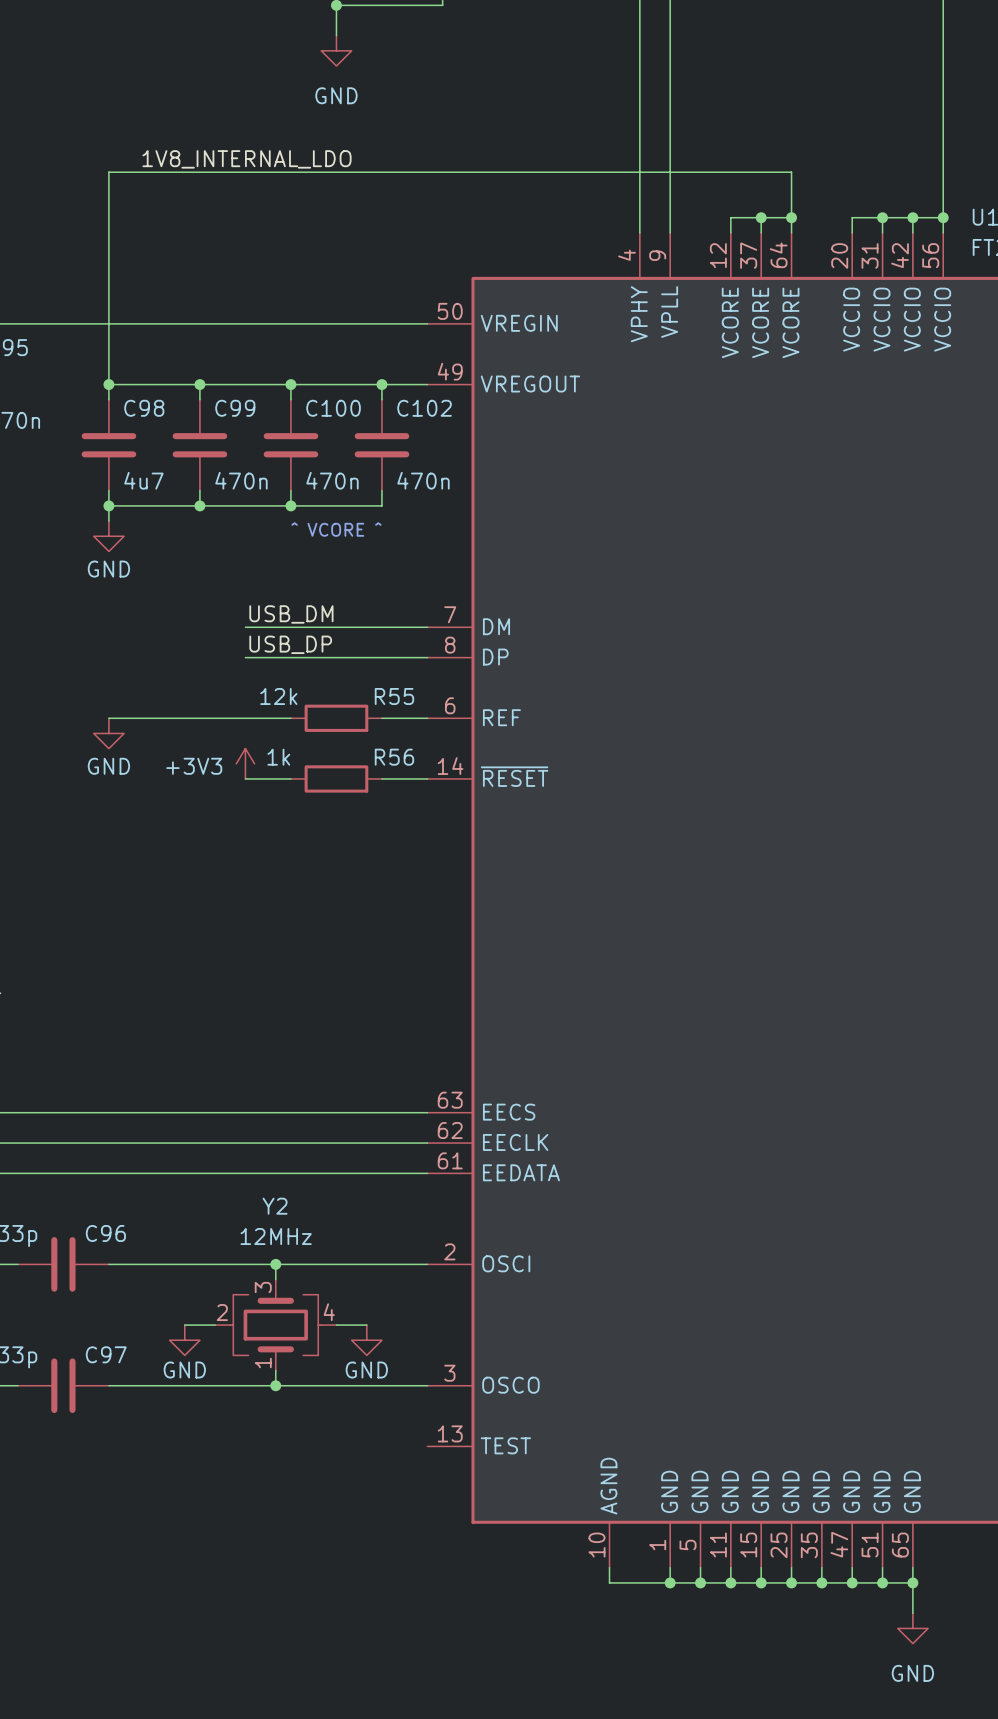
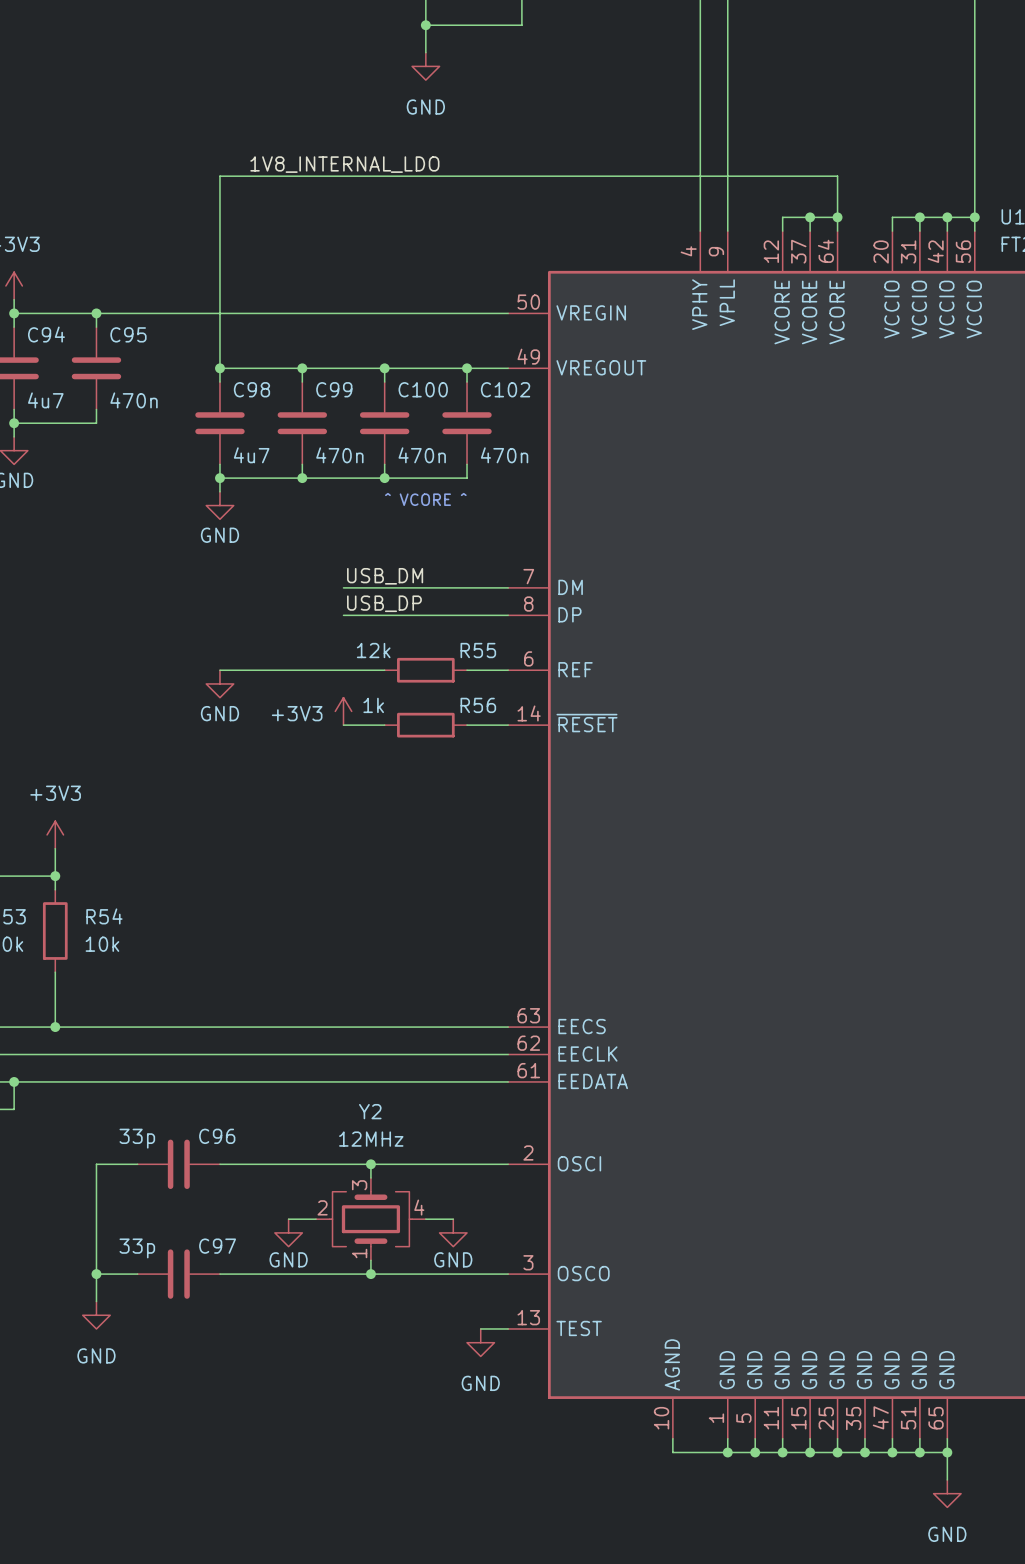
wire: none -> (480, 1328) (508, 1328)
power symbol: none -> GND (480, 1342)

